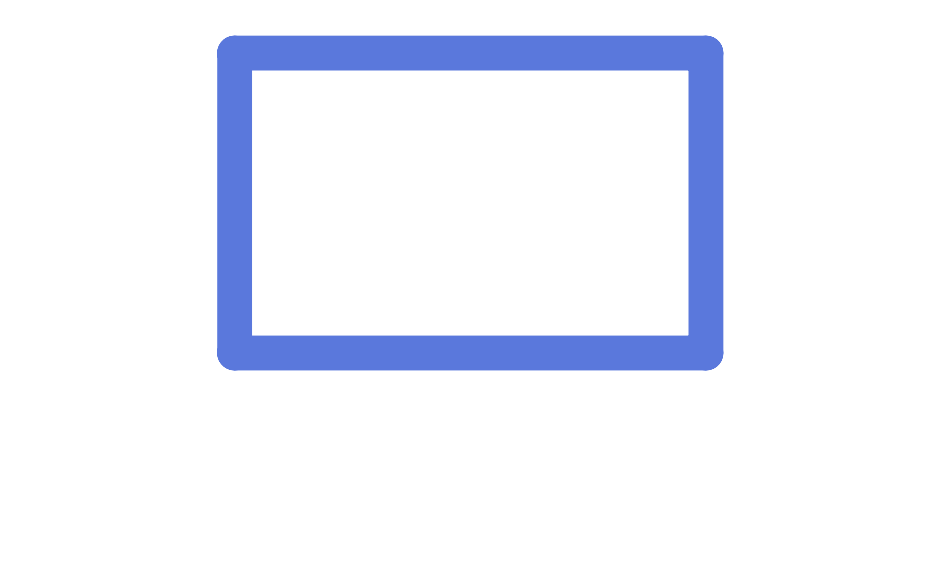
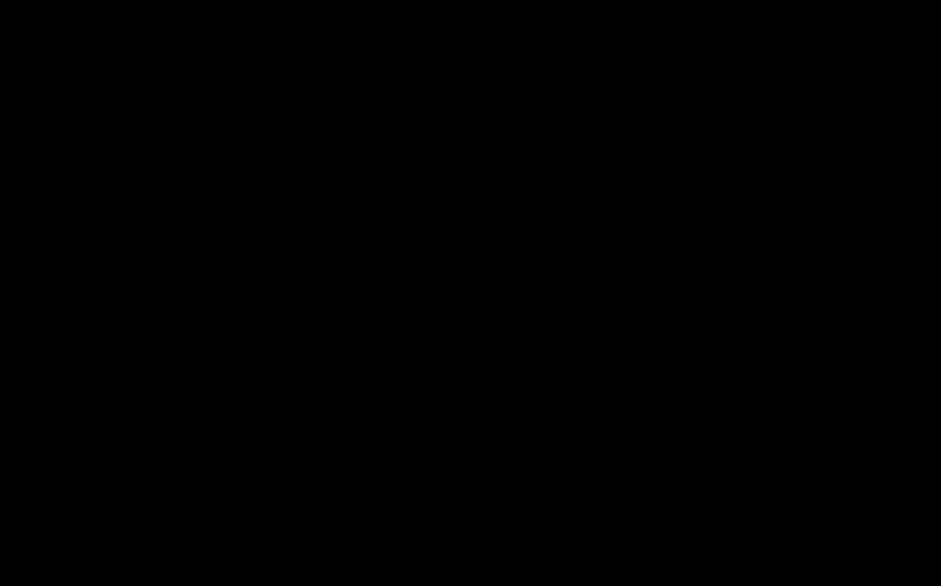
bottom track: (705, 53) (234, 53) (234, 353) (705, 353) (705, 53) -> none

